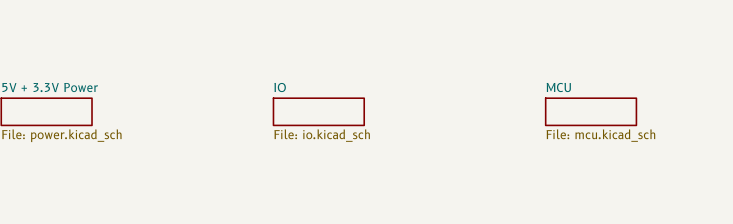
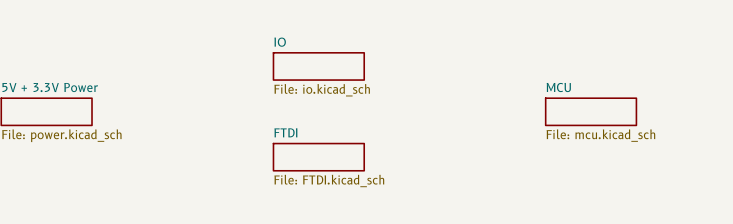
sheet IO position: (318, 111) -> (318, 66)
sheet FTDI: none -> File: FTDI.kicad_sch (318, 157)

